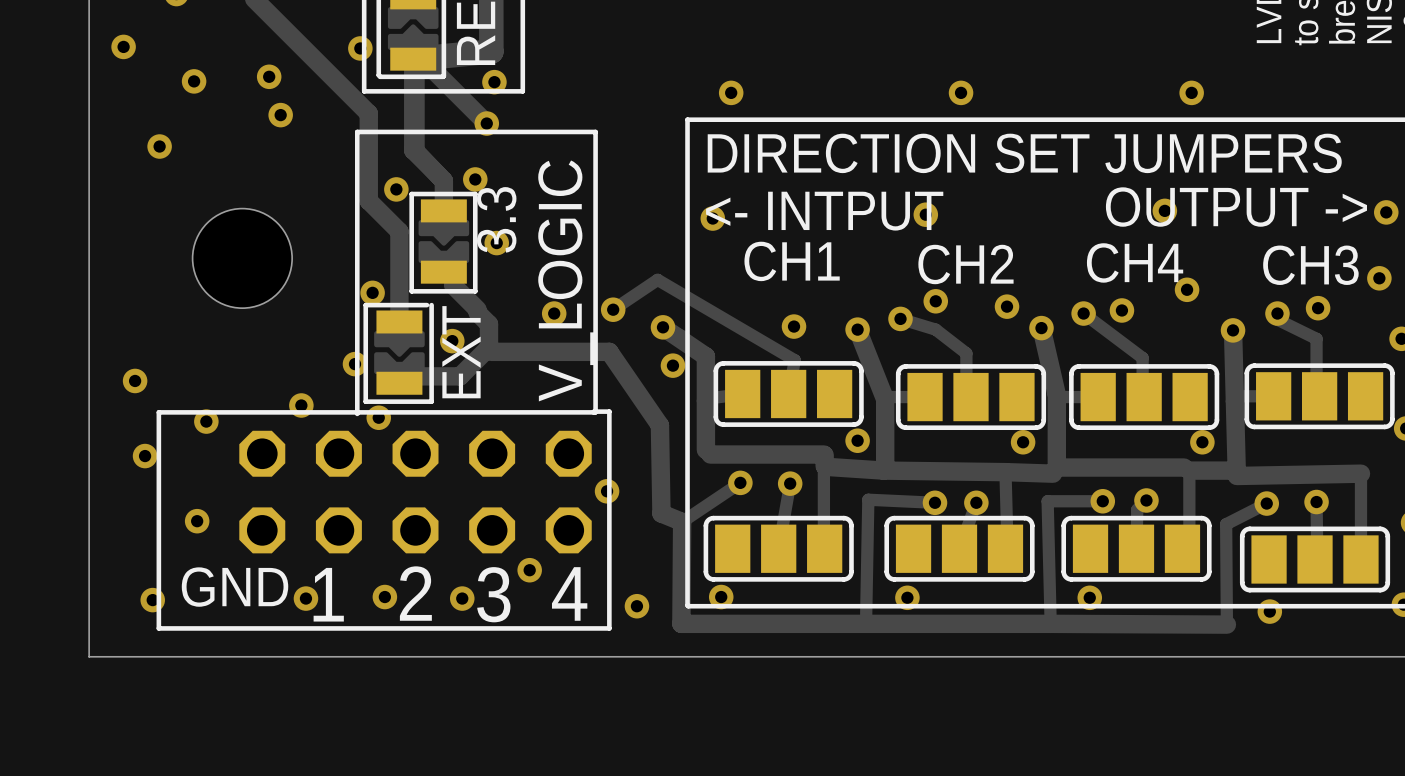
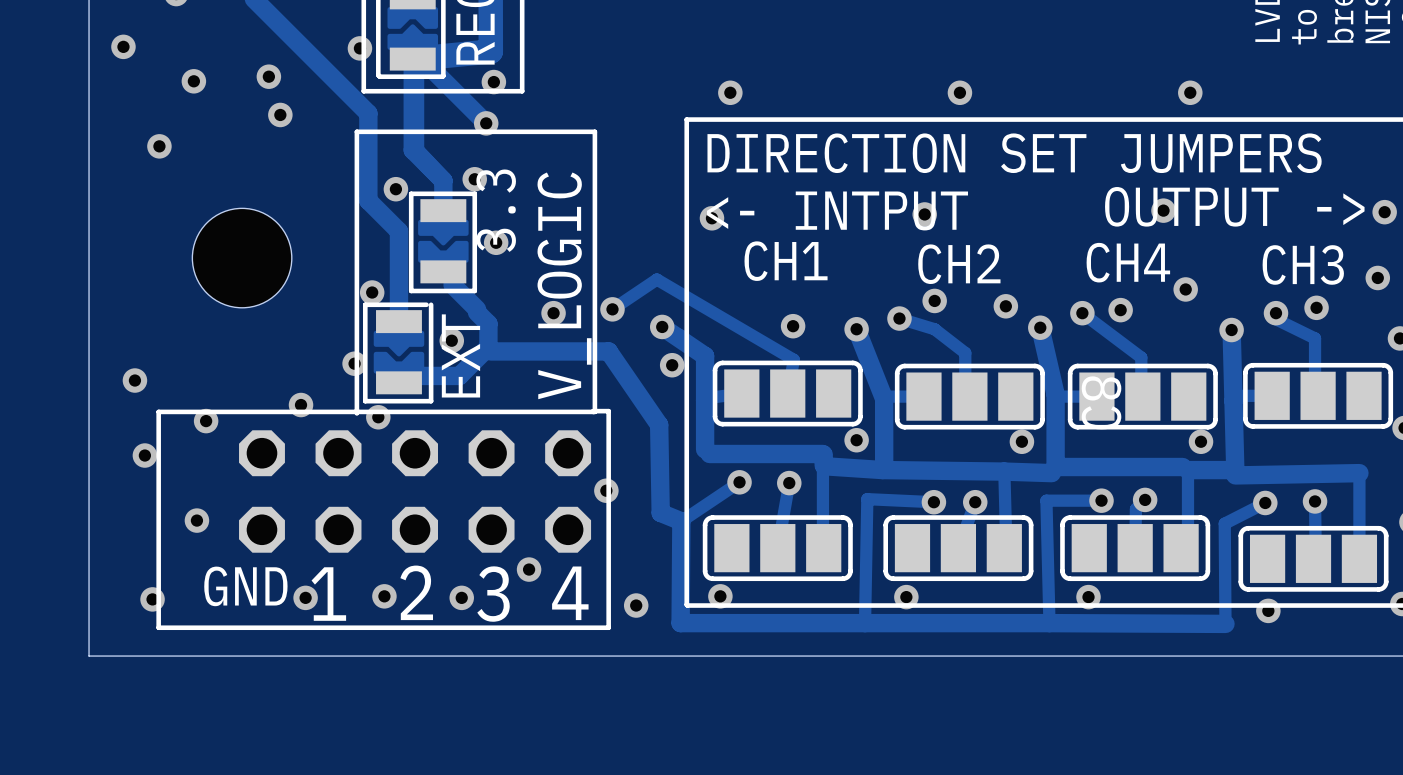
part: none -> (1101, 402)

